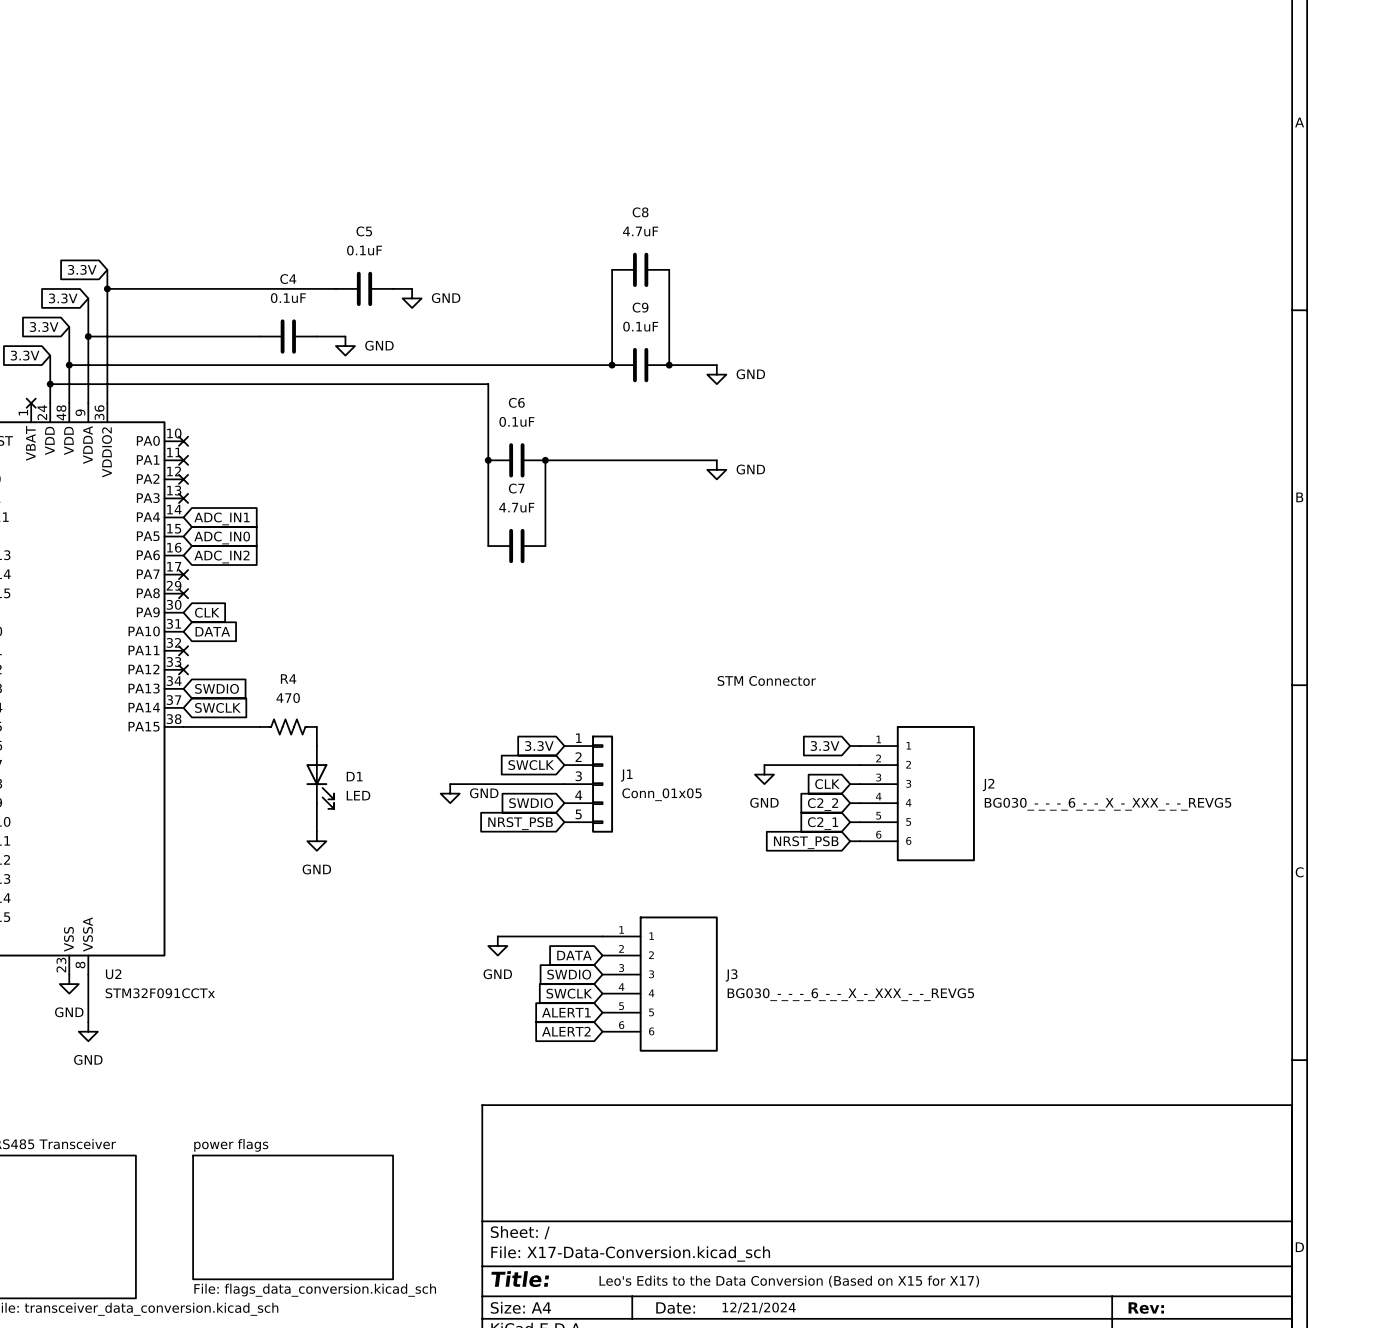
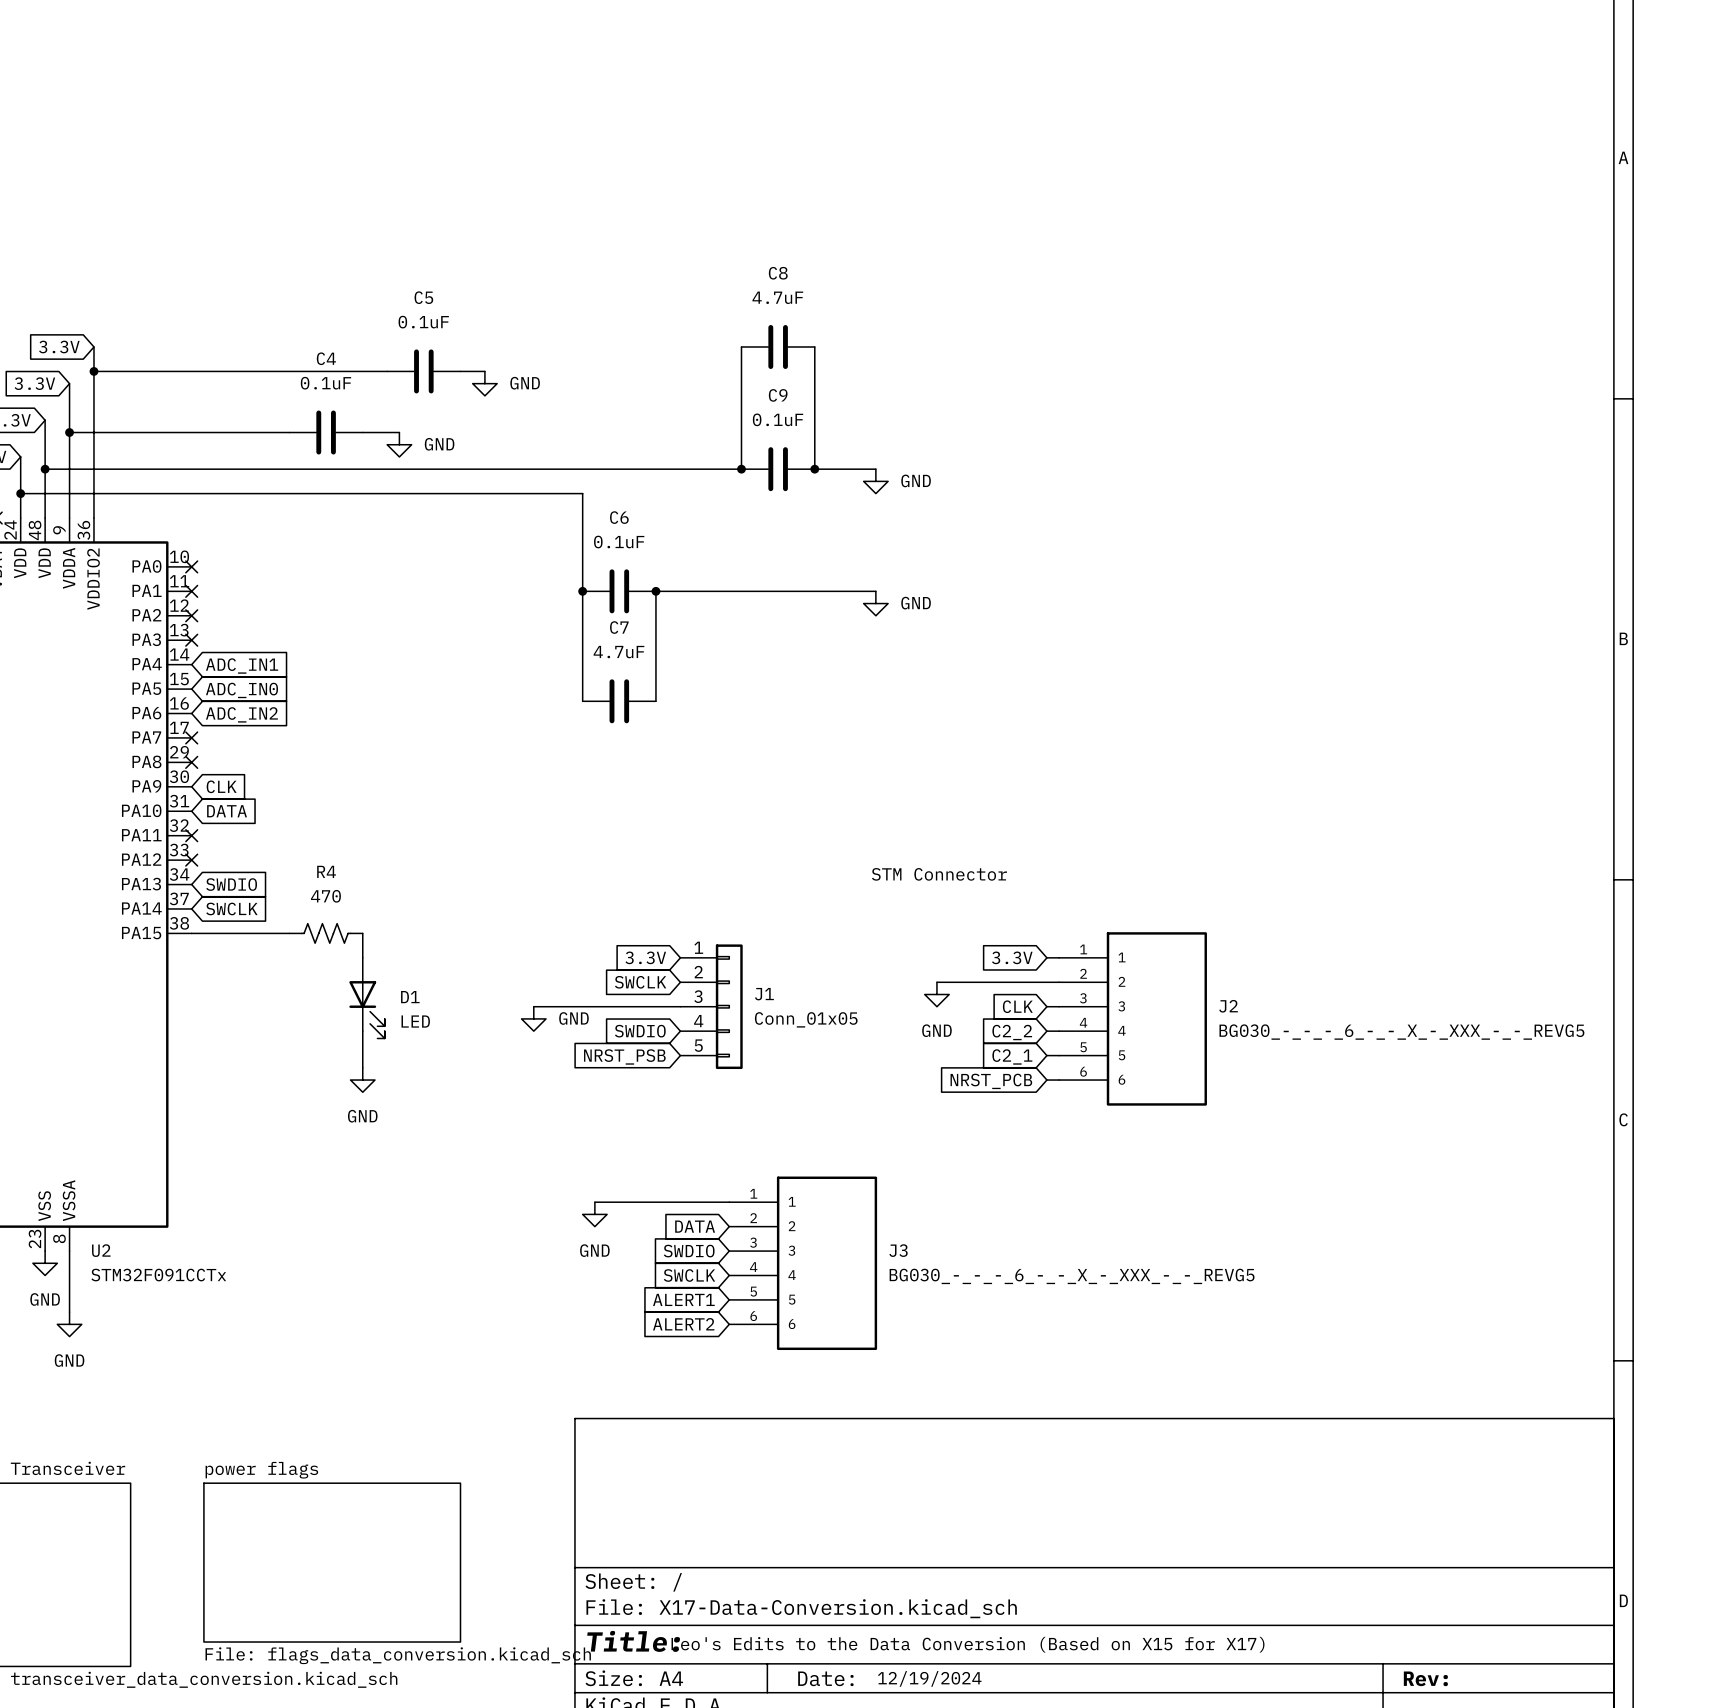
global label: NRST_PSB (806, 842) -> NRST_PCB (991, 1081)
text: 12/21/2024 (759, 1308) -> 12/19/2024 (929, 1678)

